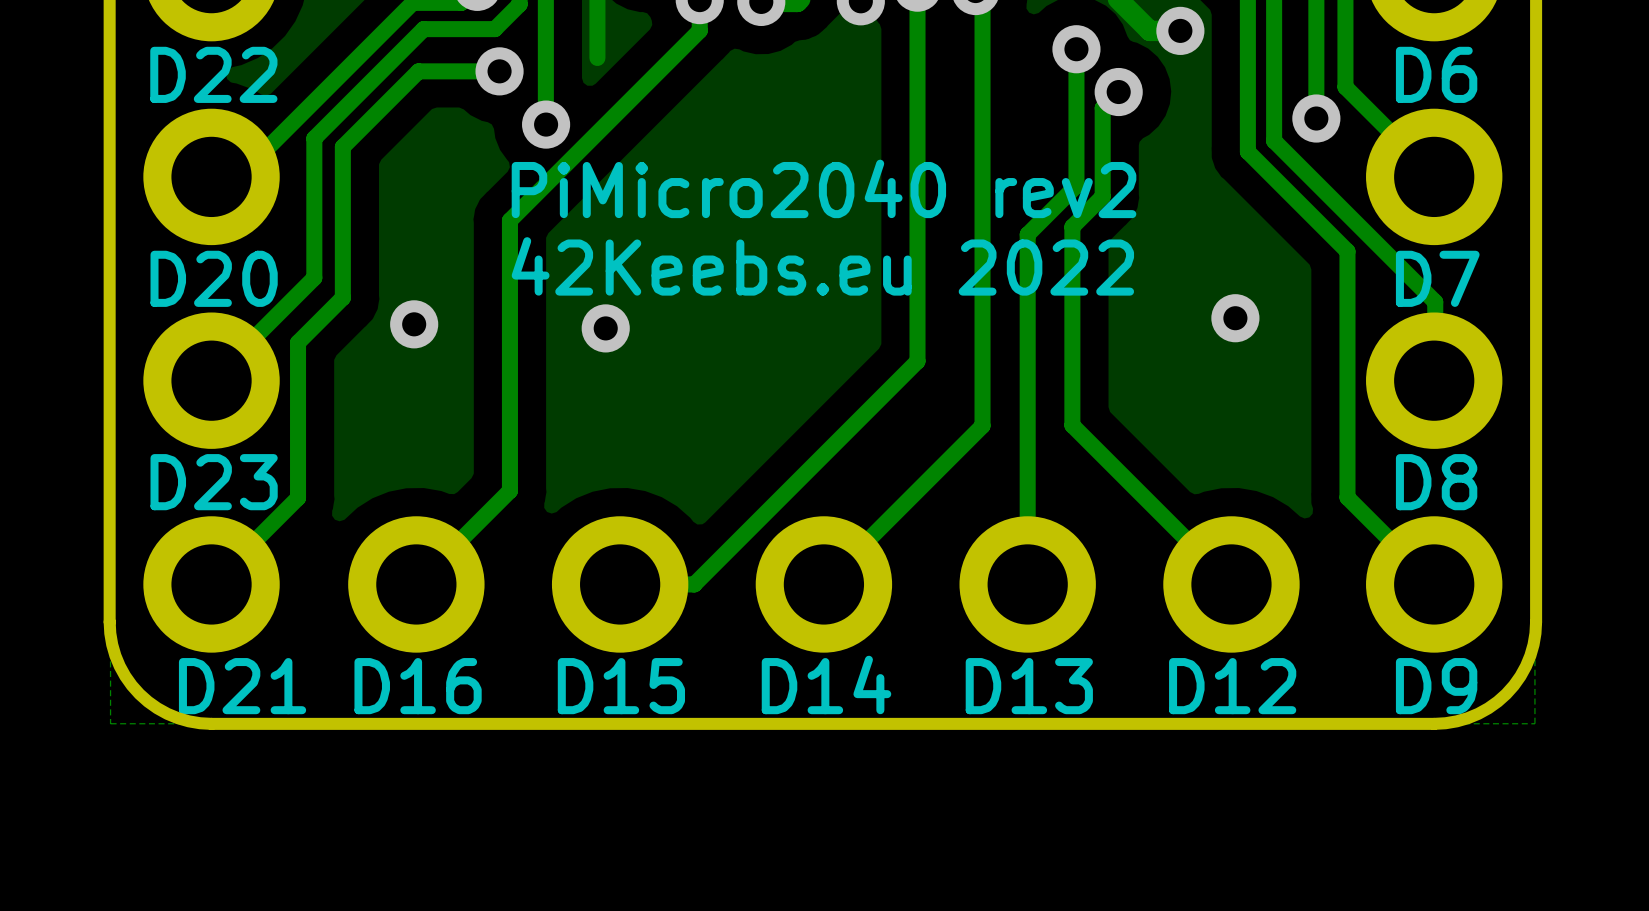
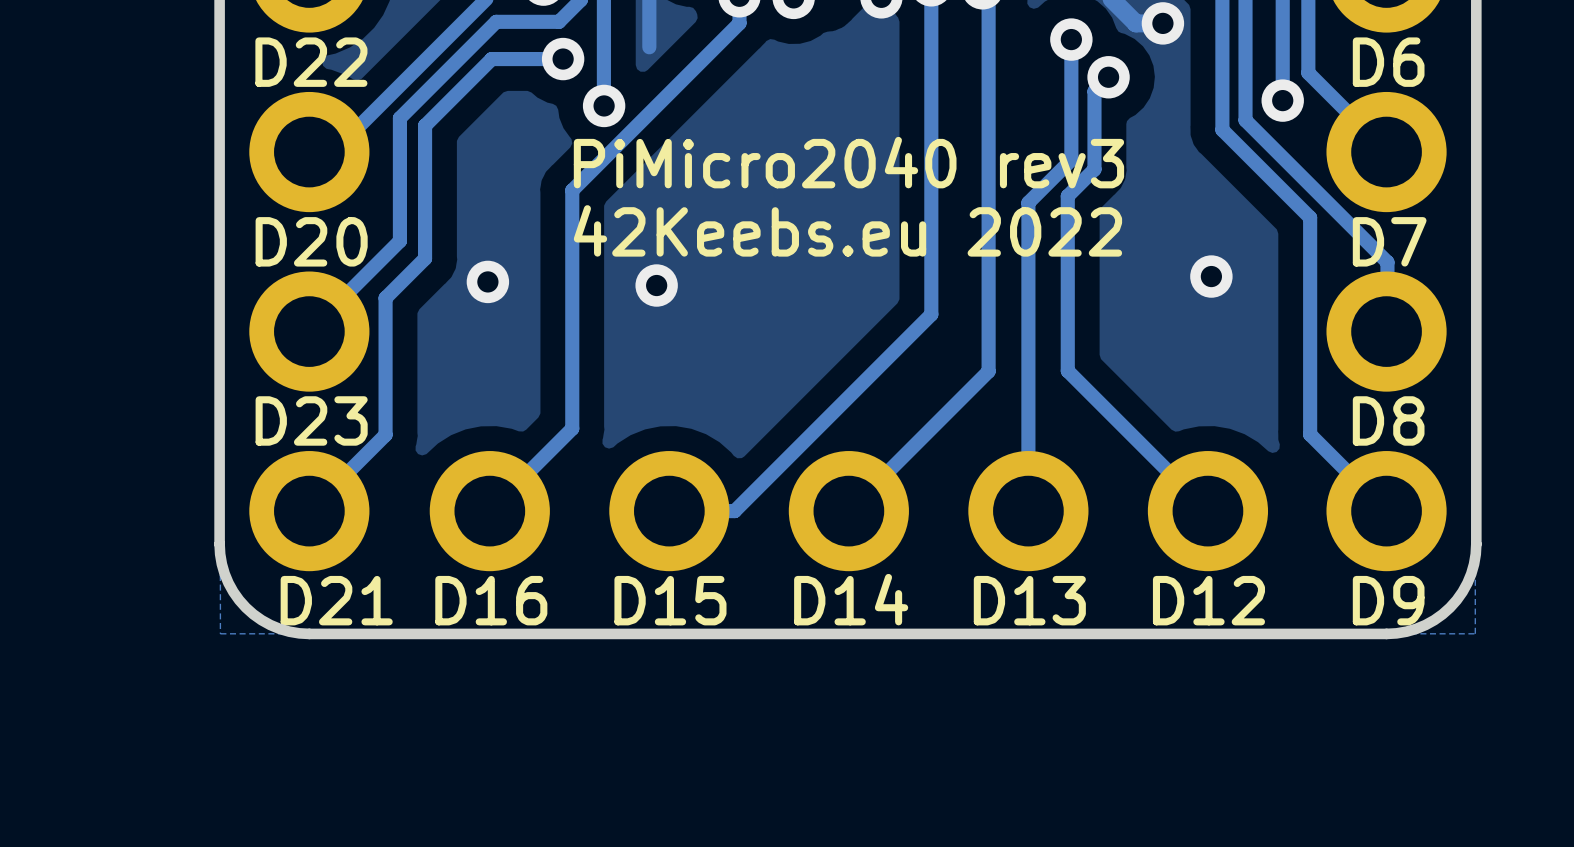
text: PiMicro2040 rev2 (824, 188) -> PiMicro2040 rev3 (848, 162)

